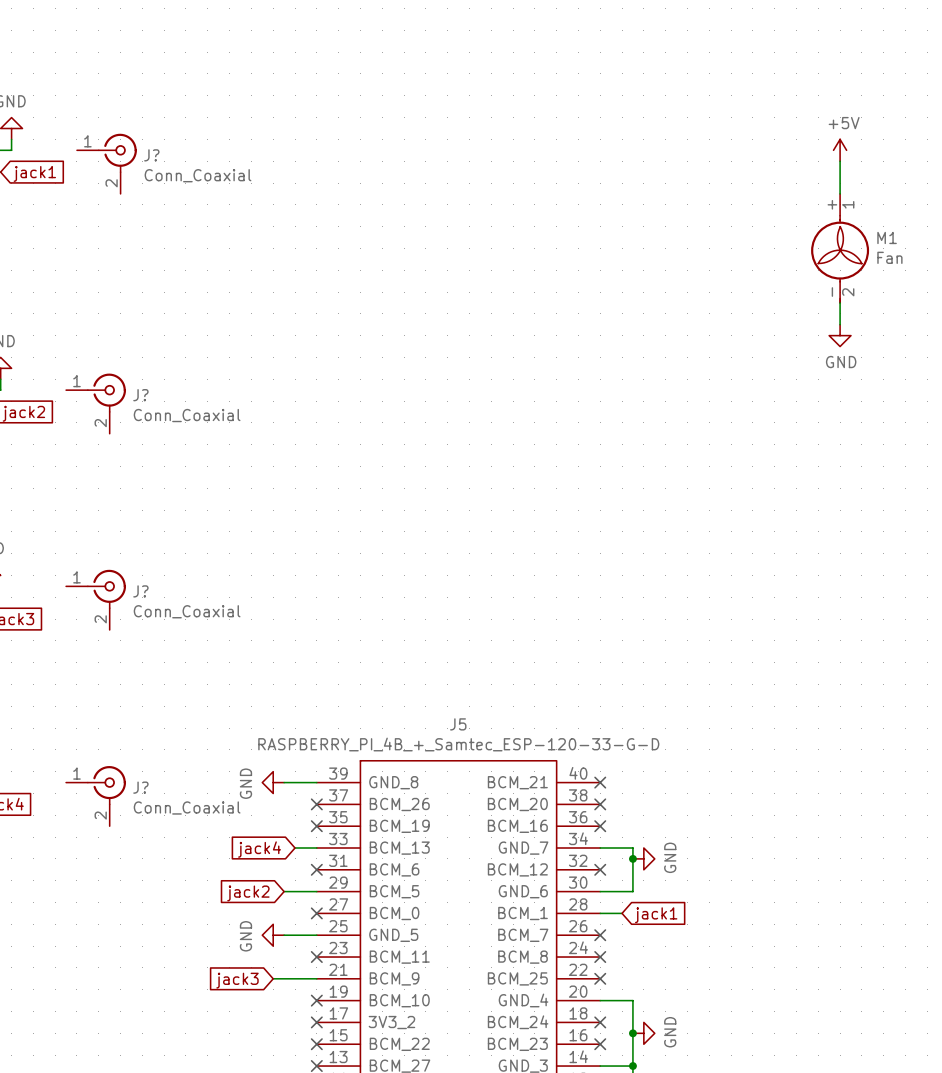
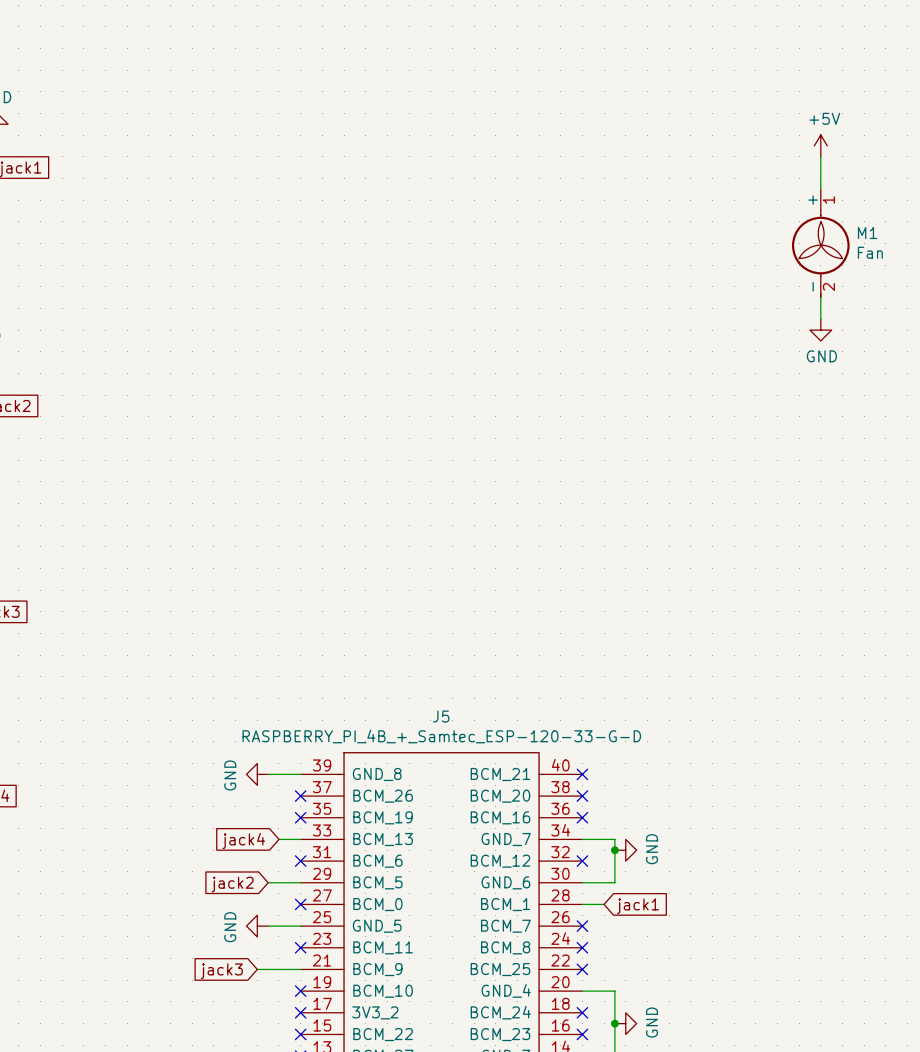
J?: Conn_Coaxial (106, 163) -> none
J?: Conn_Coaxial (96, 403) -> none
J?: Conn_Coaxial (96, 599) -> none
J?: Conn_Coaxial (96, 796) -> none

